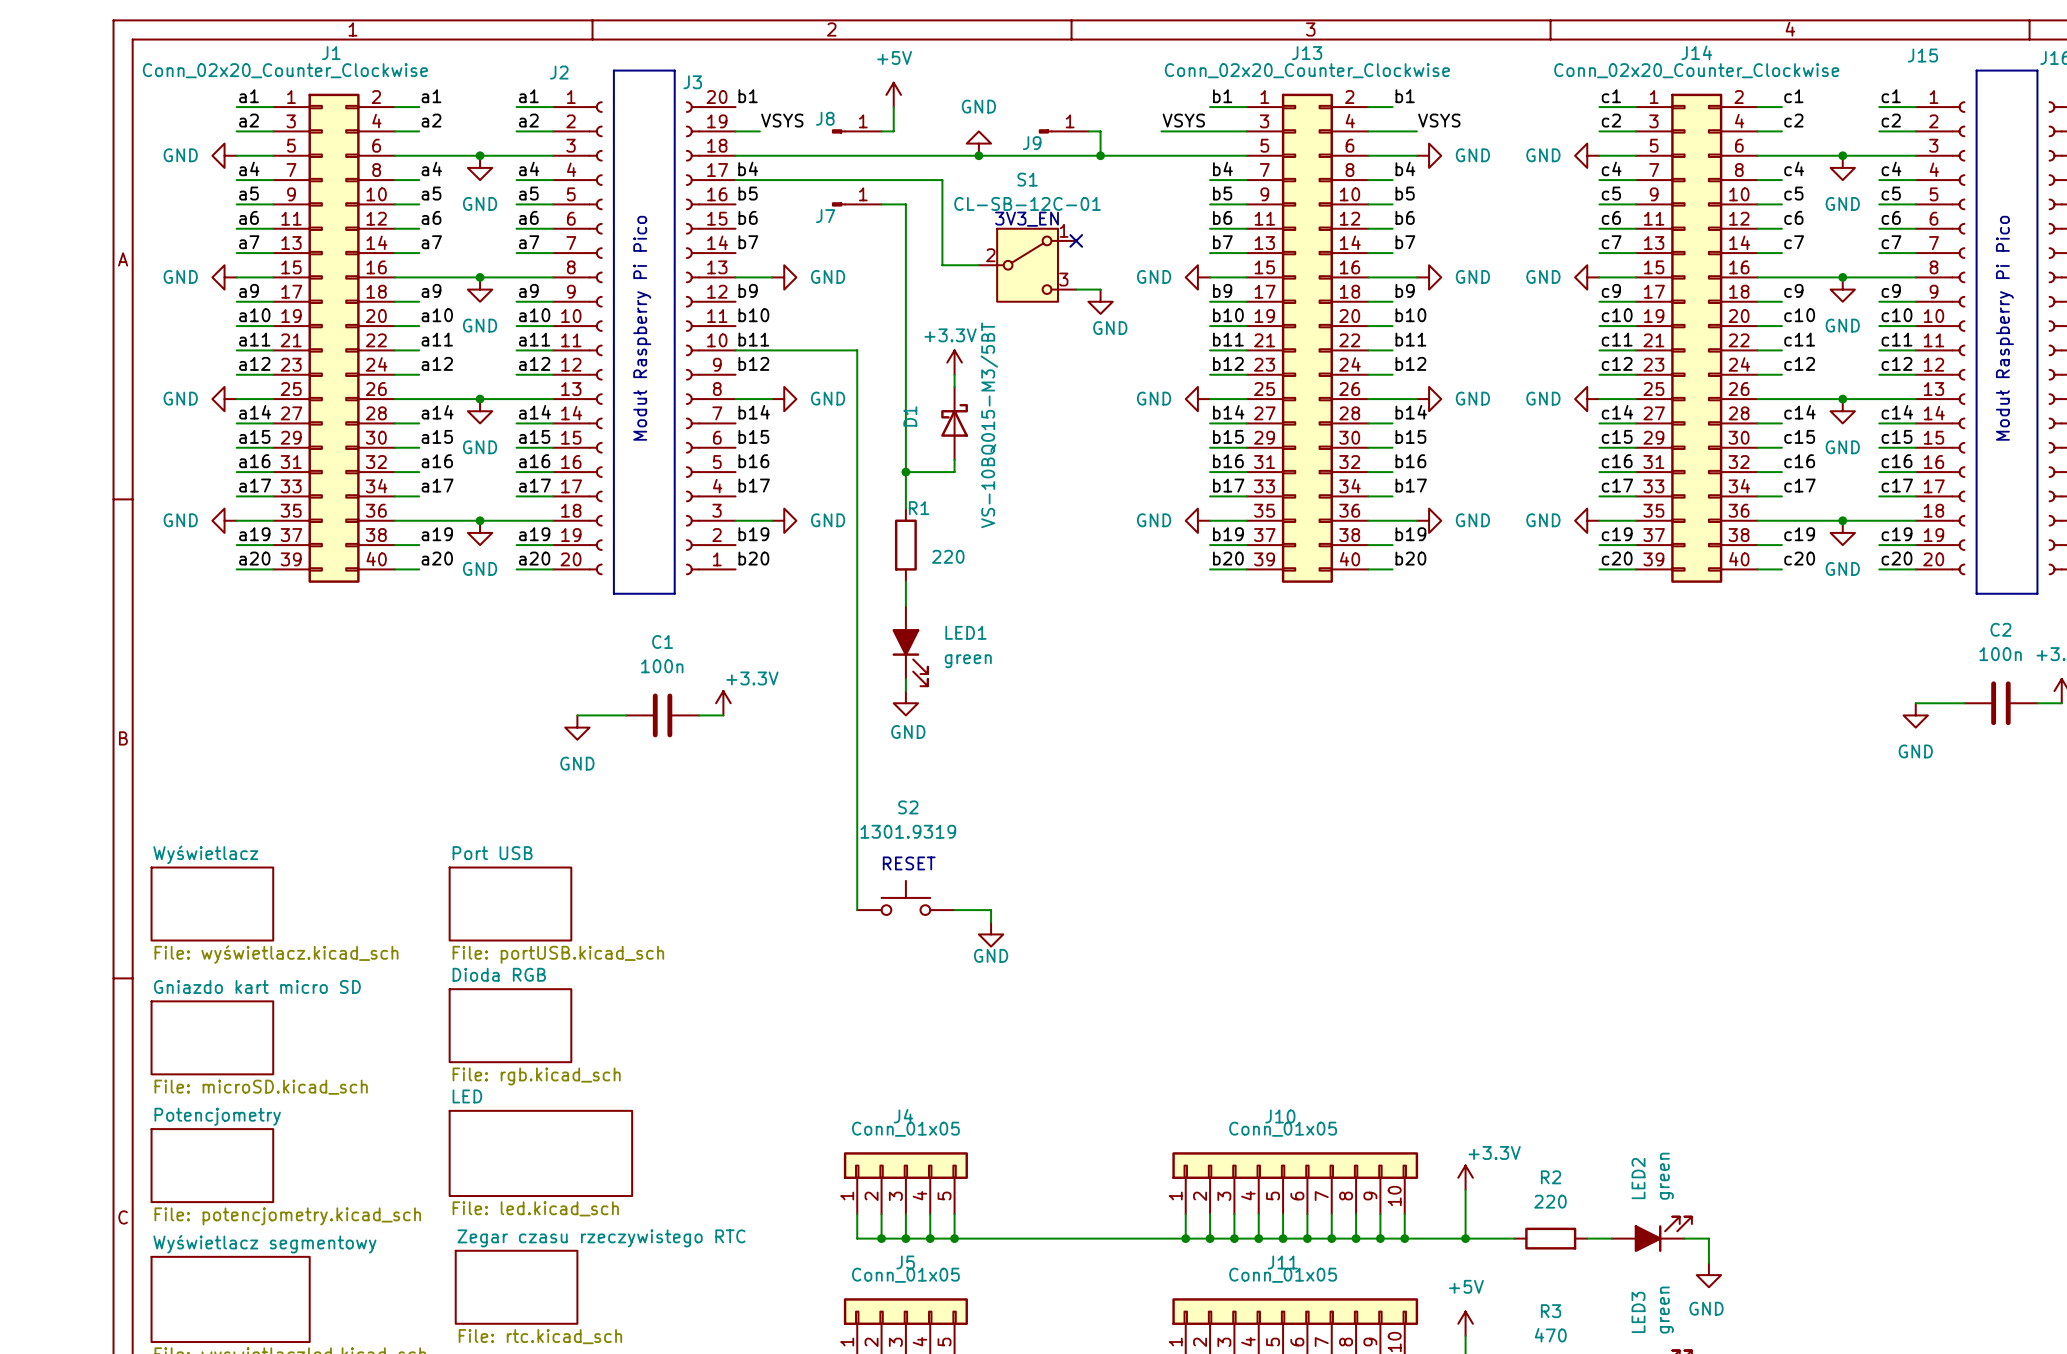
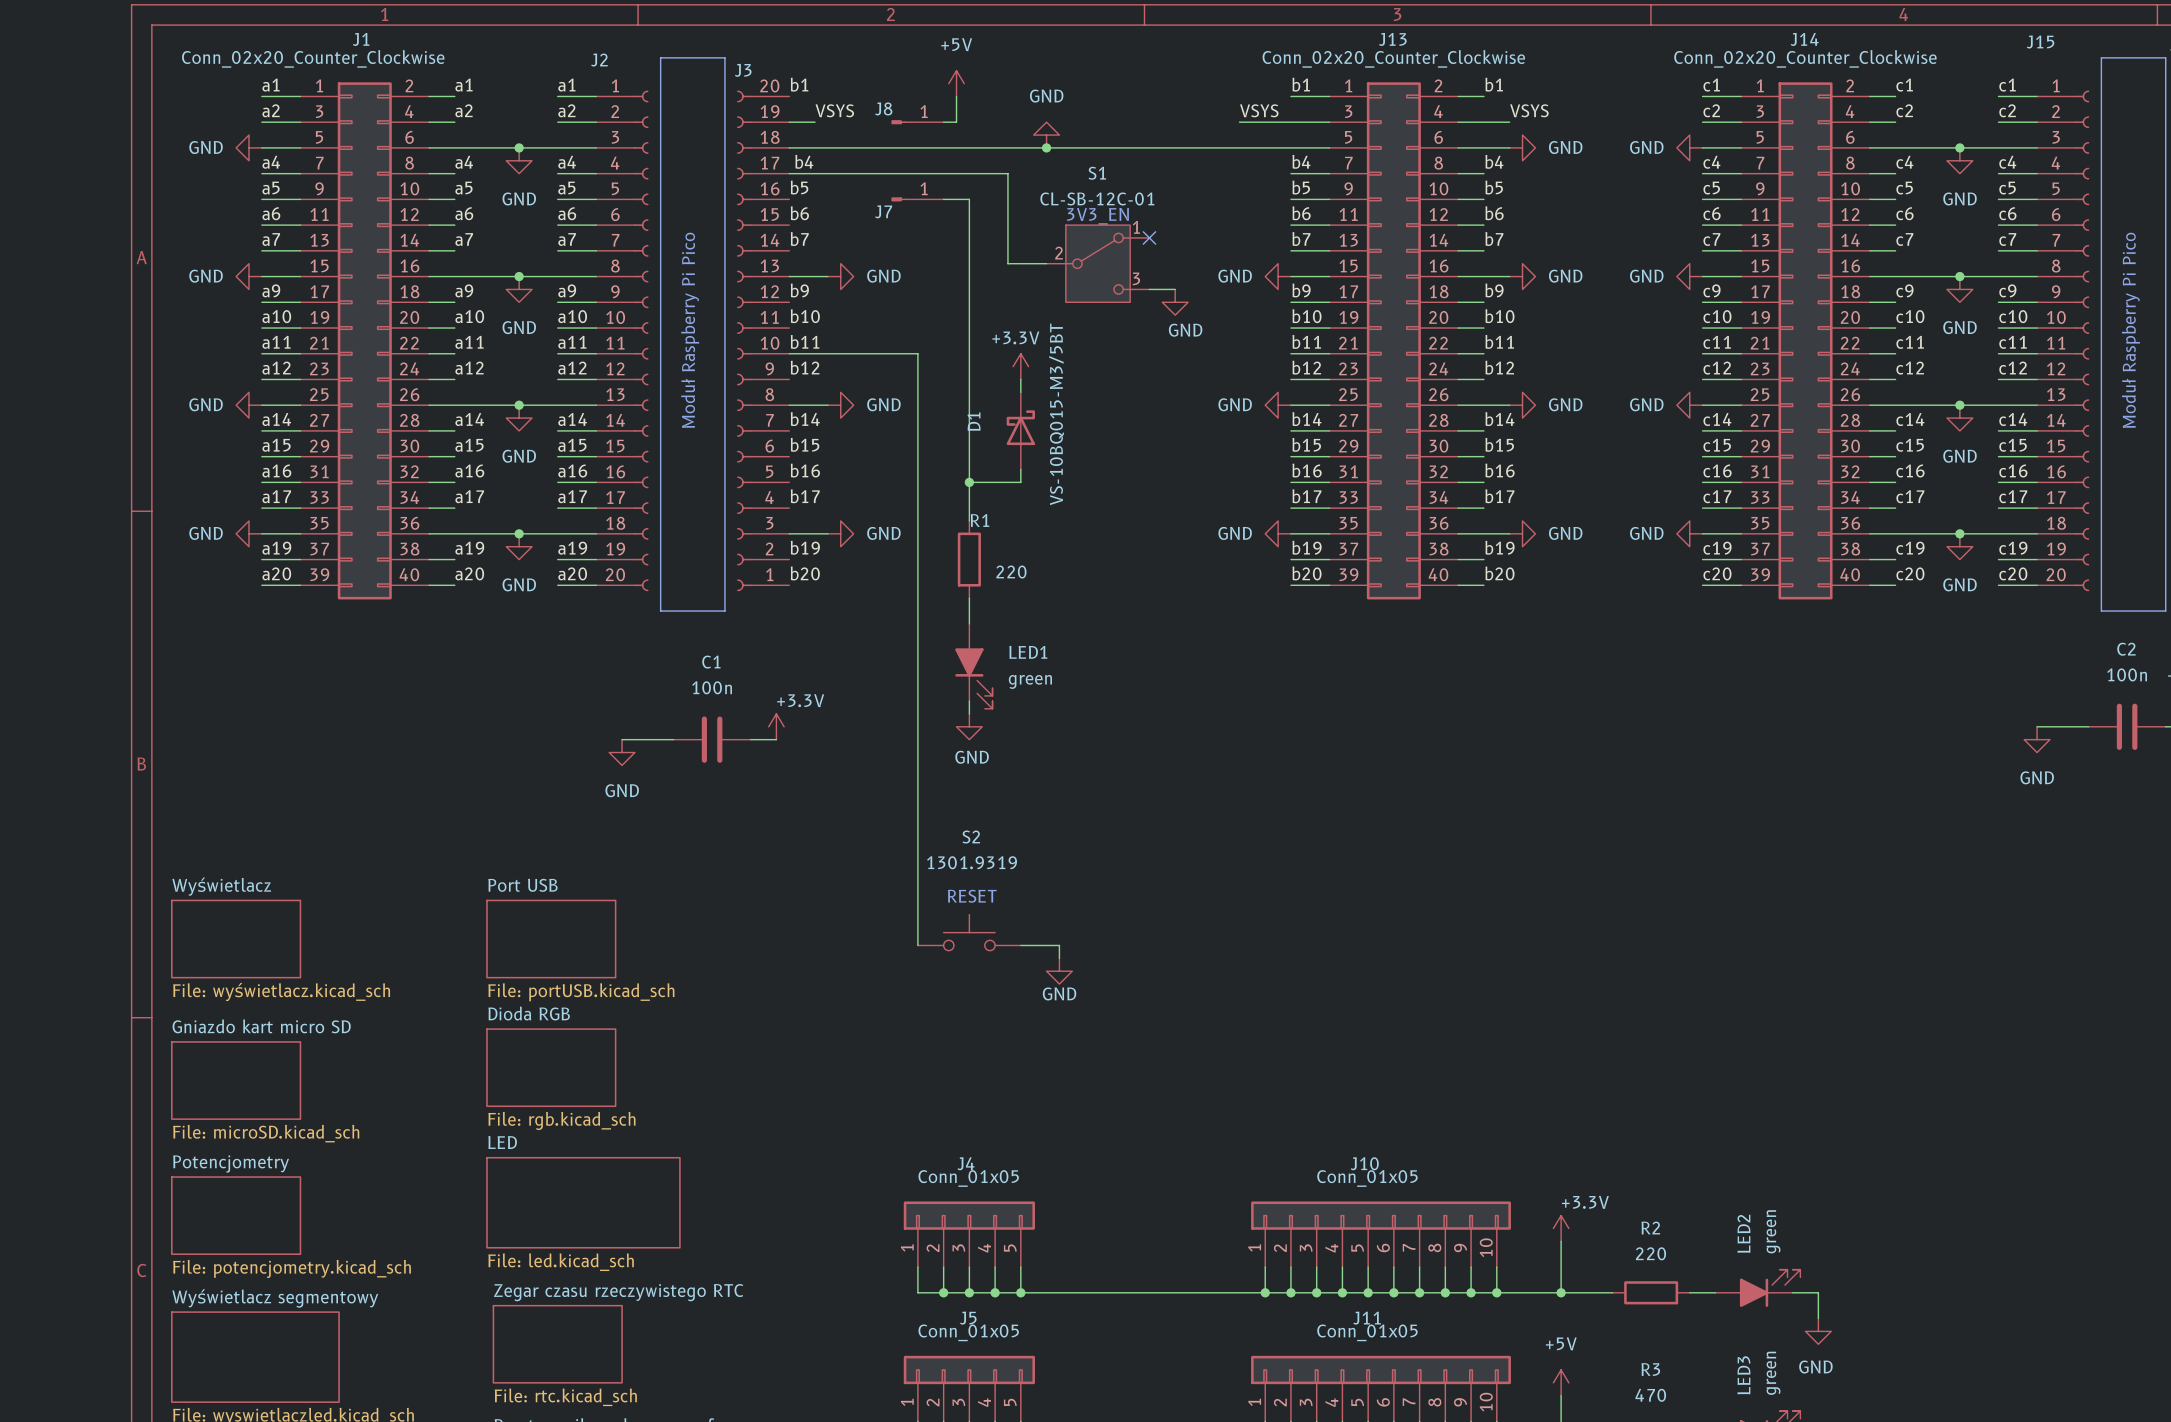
J9: (1063, 131) -> none
wire: (1088, 131) (1100, 131) (1100, 155) -> none
junction: (1100, 155) -> none

